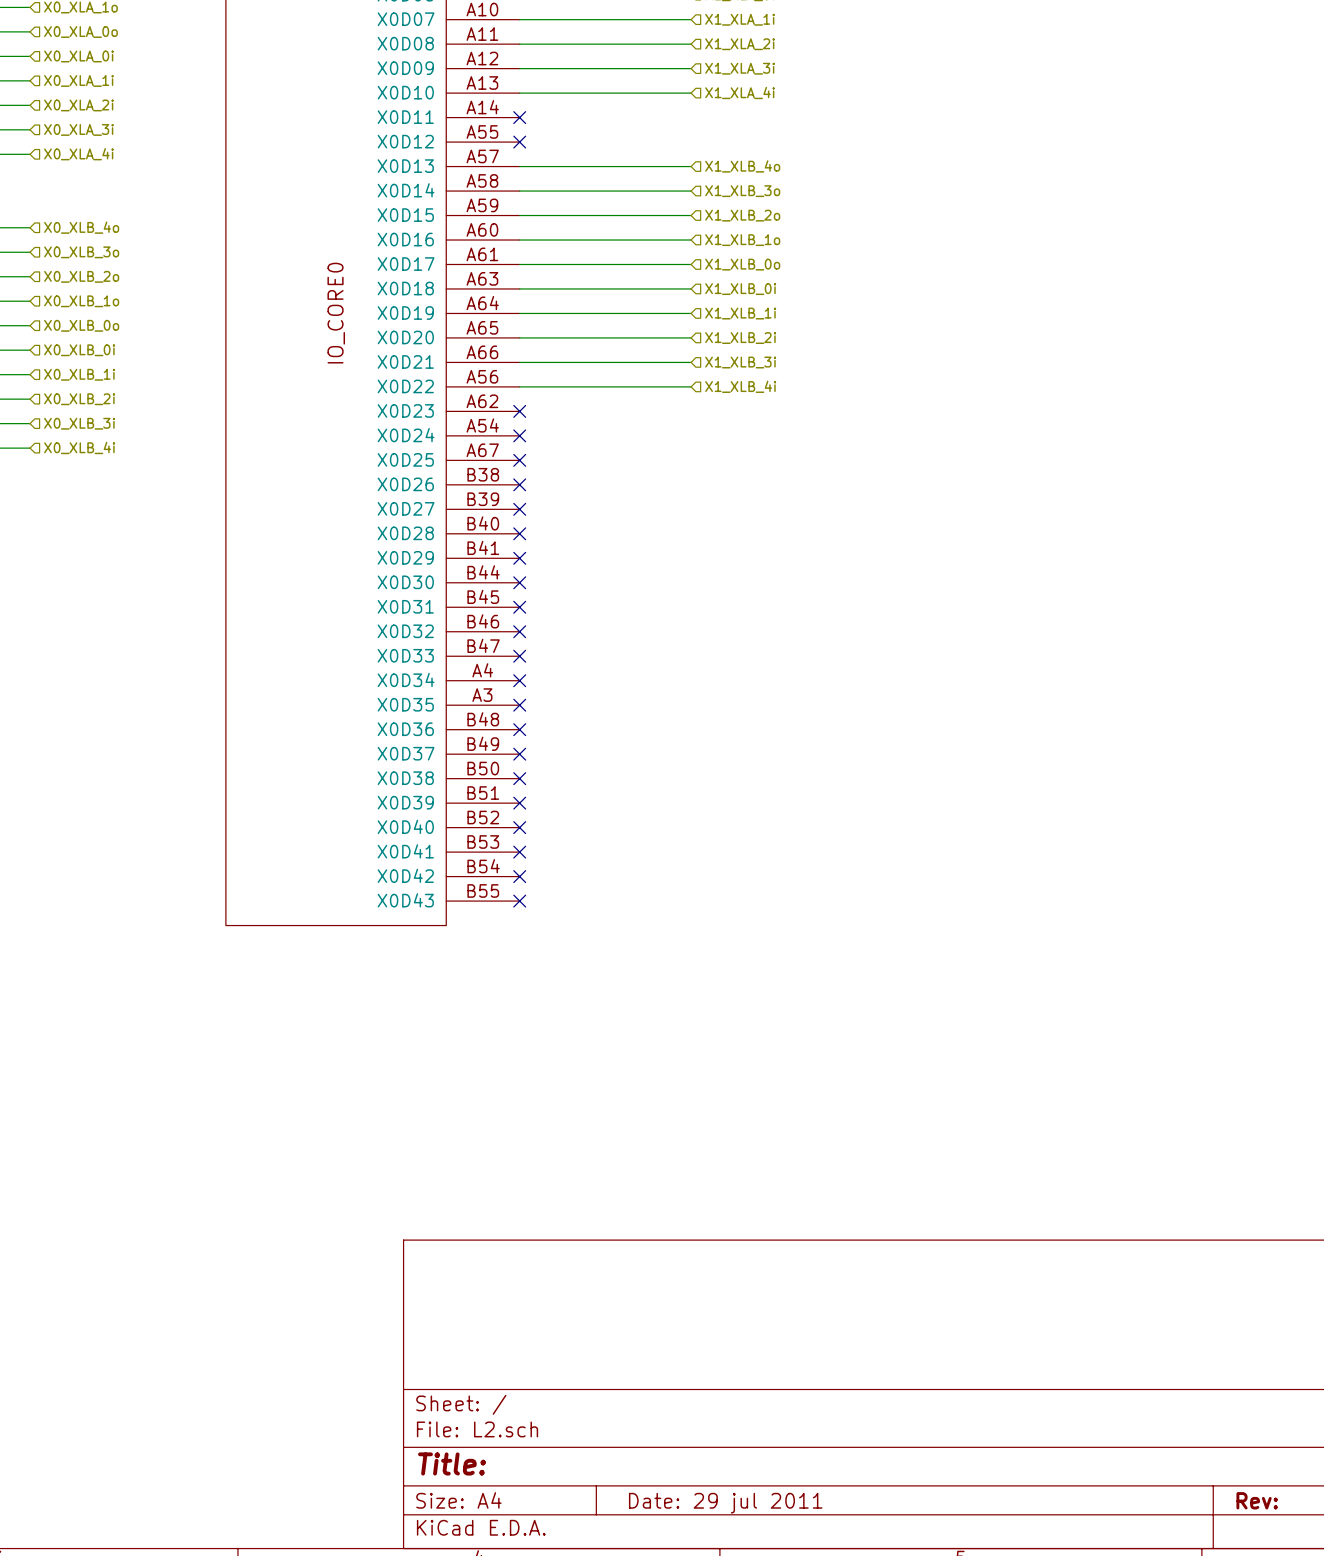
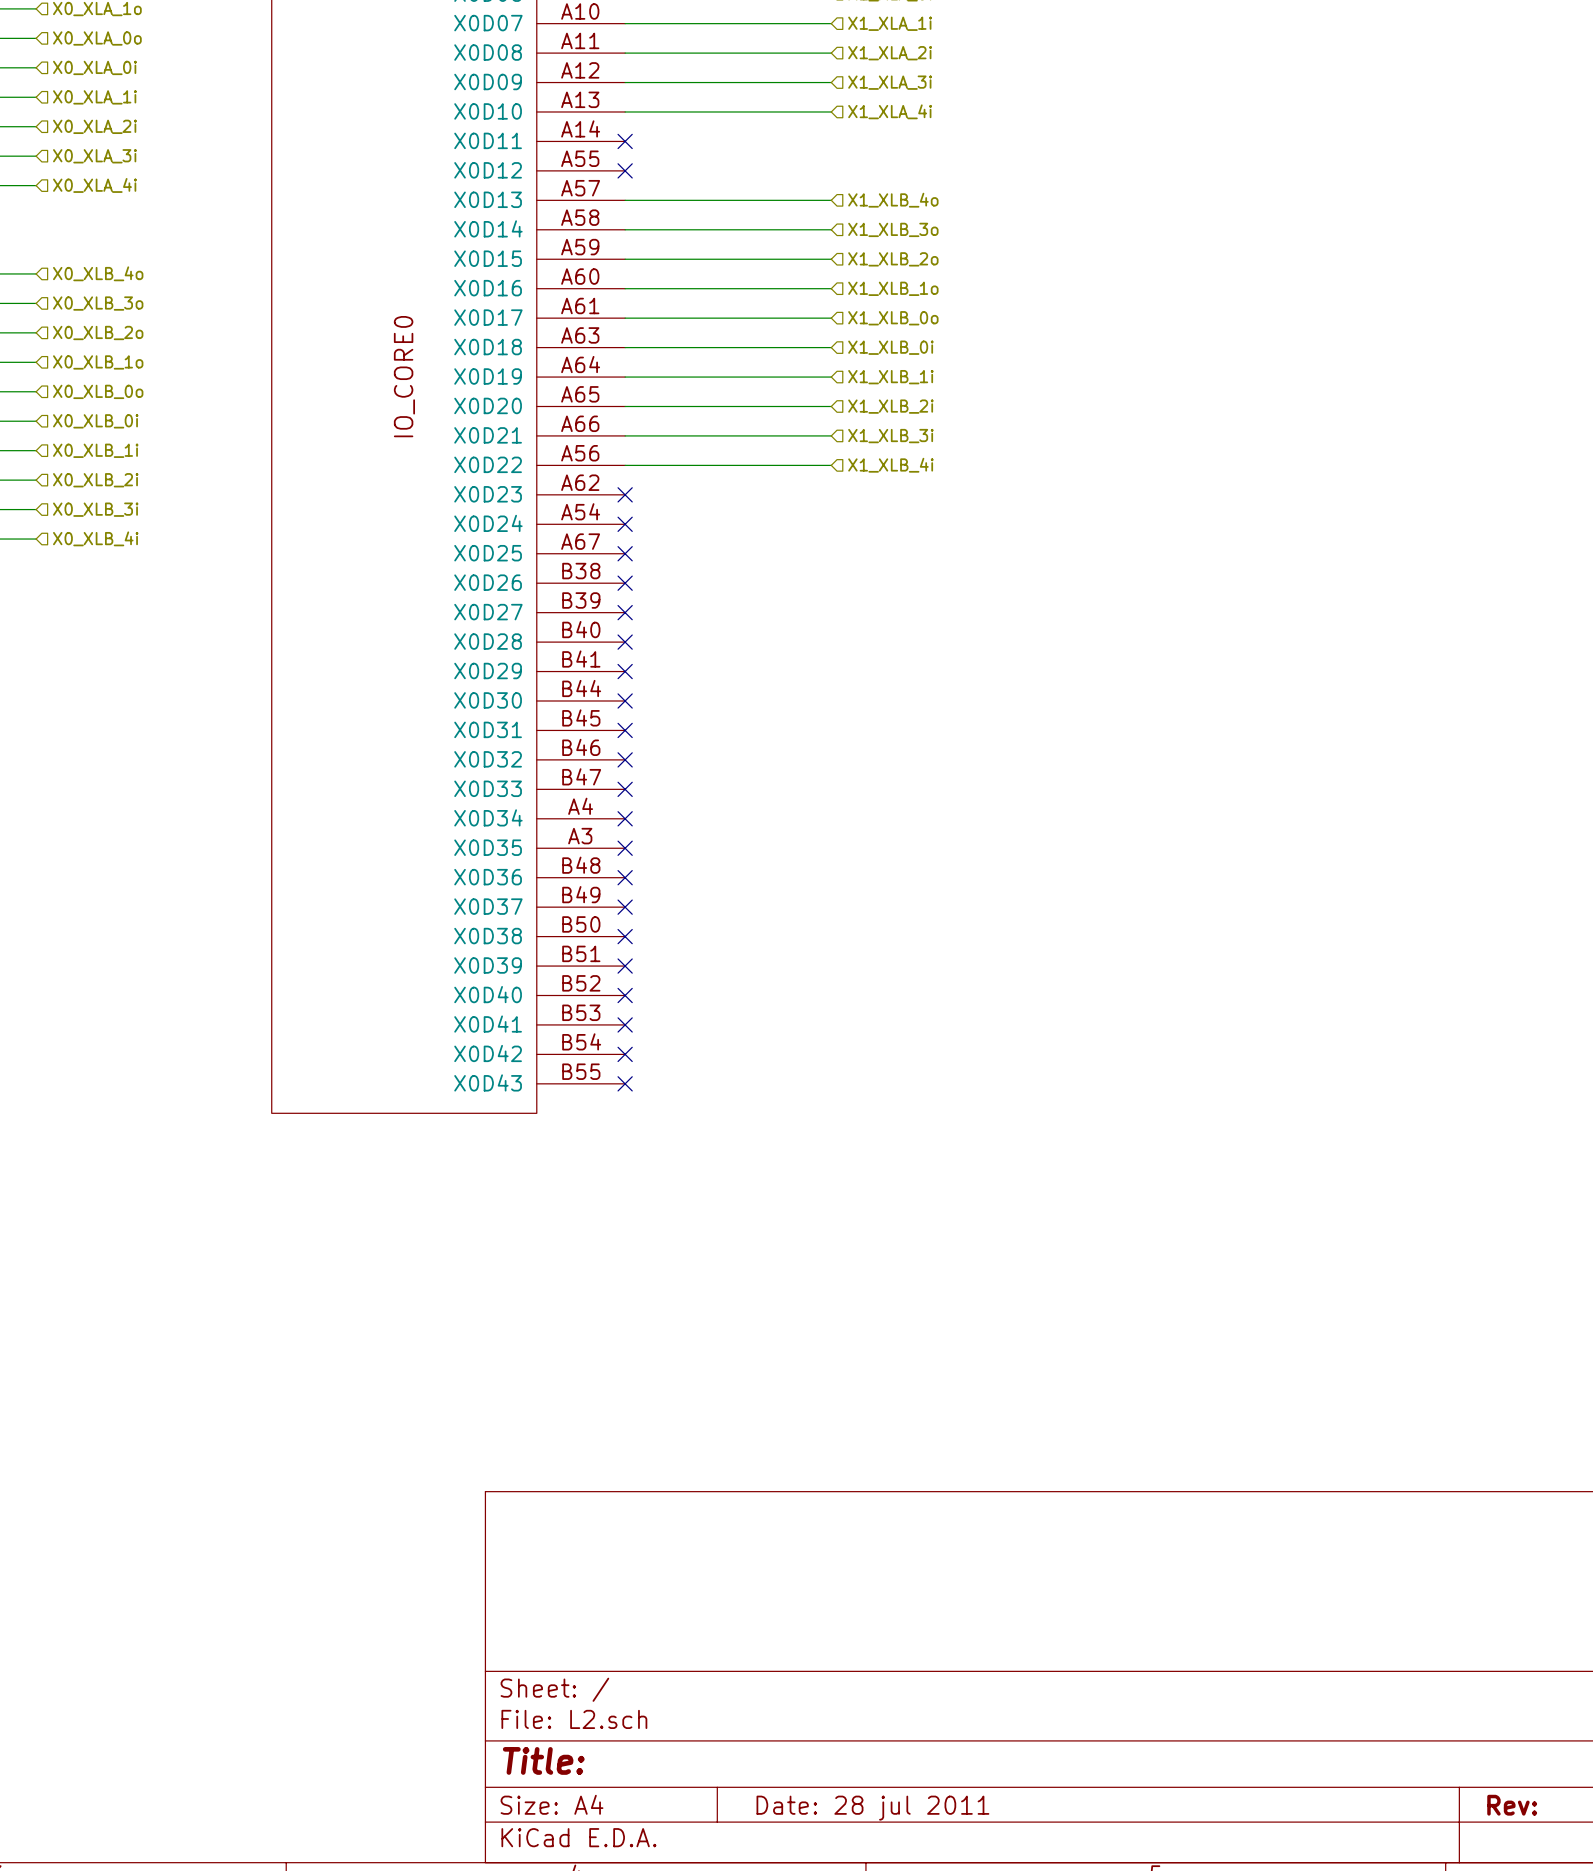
title block: Date: 29 jul 2011 (725, 1503) -> Date: 28 jul 2011 (872, 1808)

